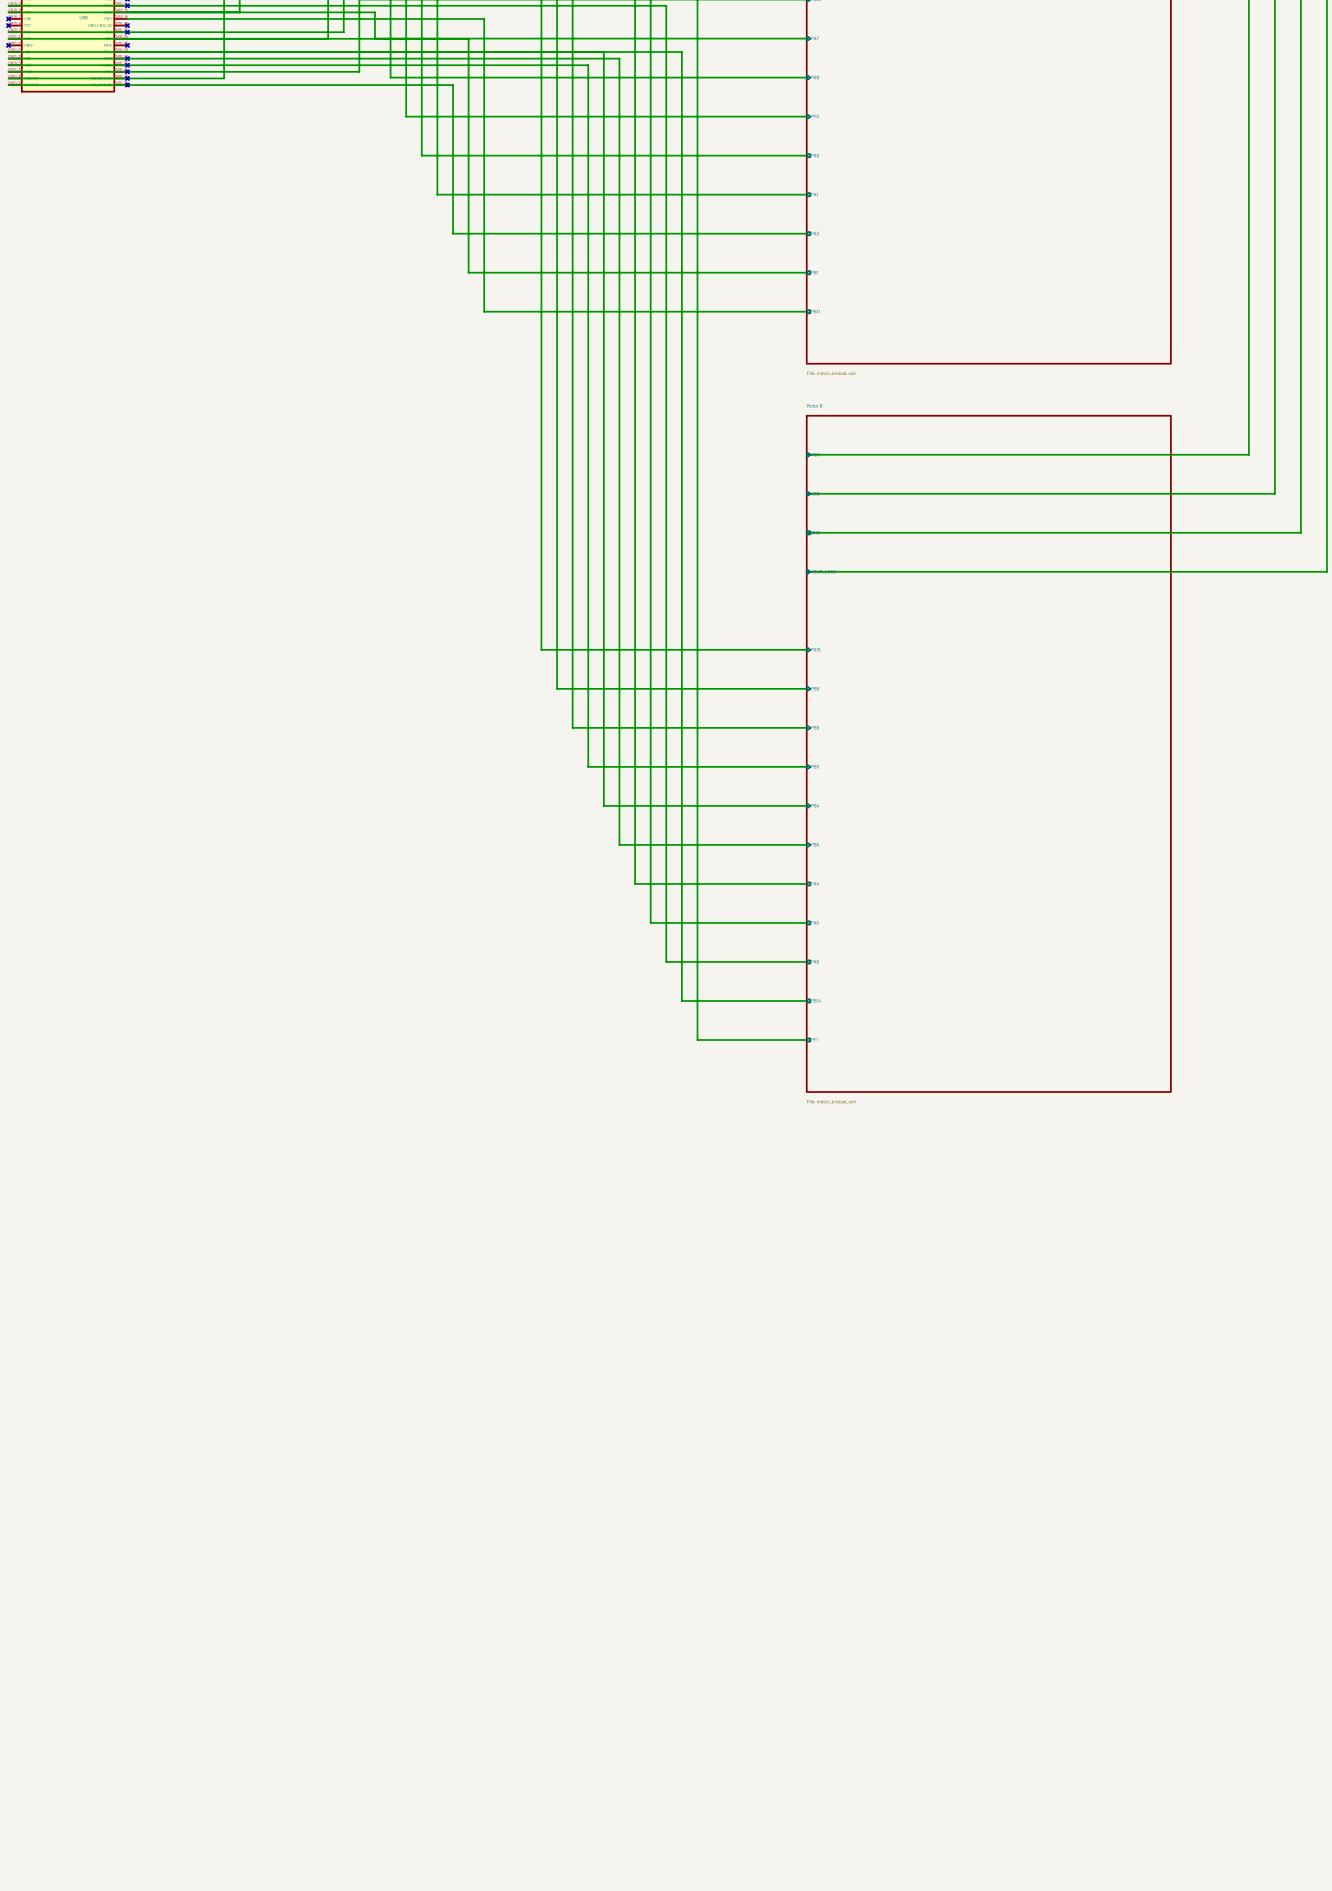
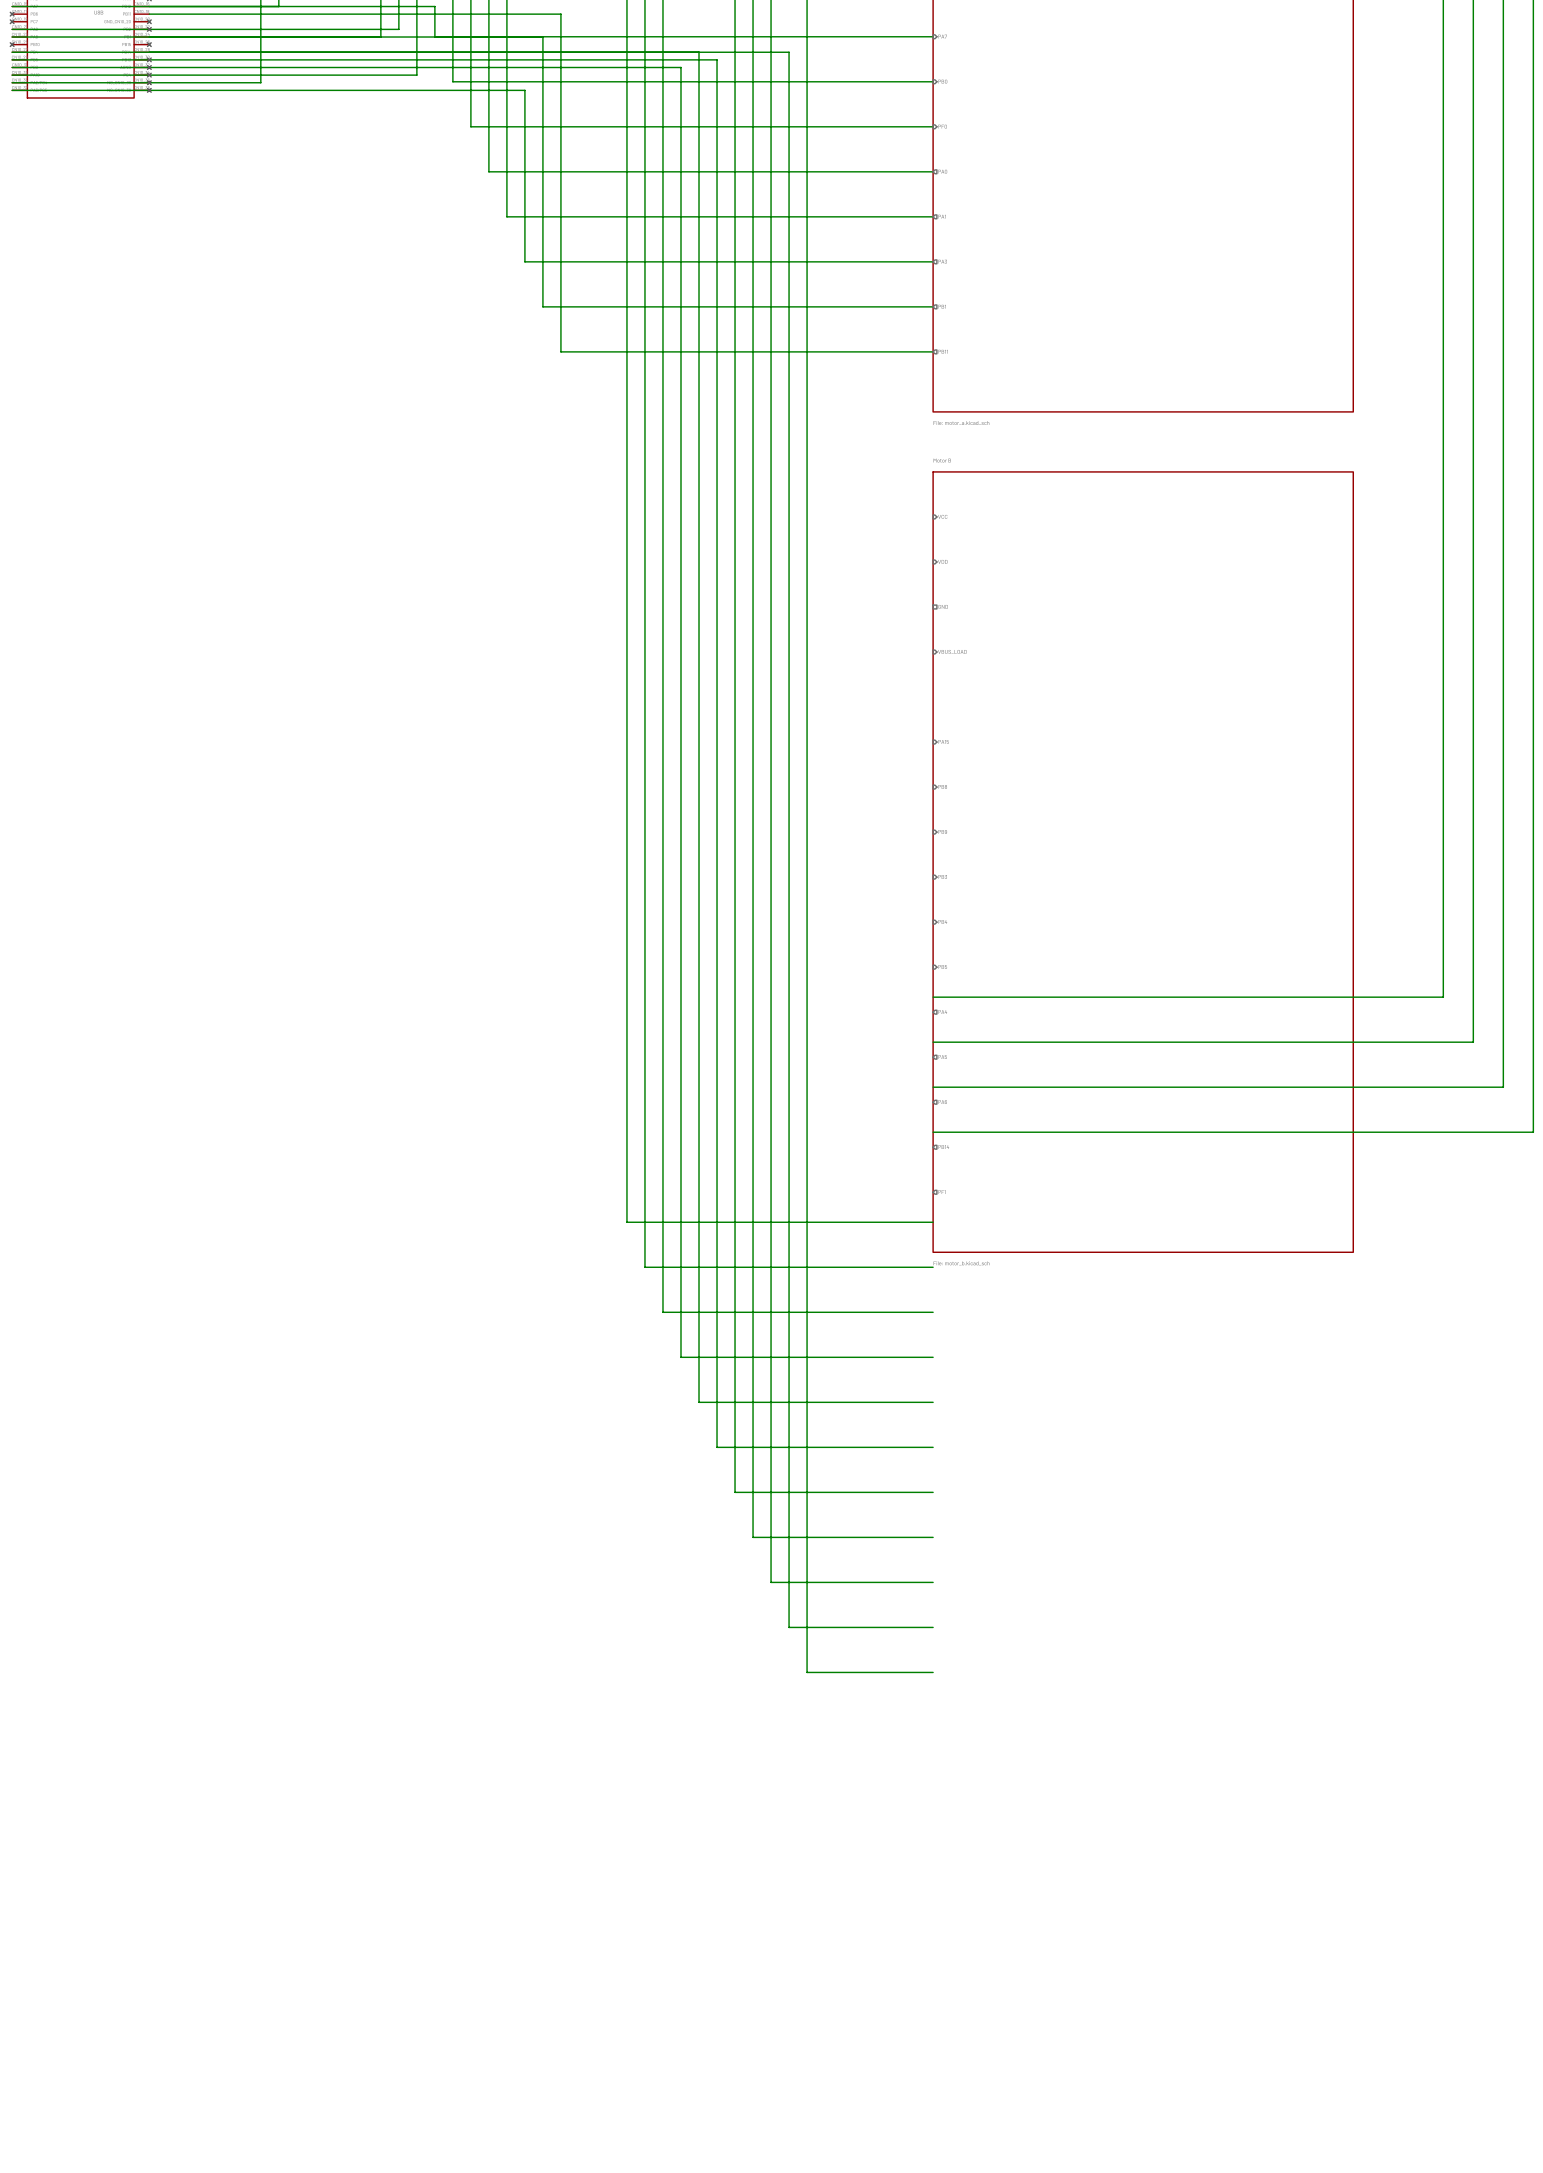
wire: (806, 454) (1248, 454) -> (933, 997) (1443, 997) (1443, 516)
wire: (806, 493) (1274, 493) -> (933, 1042) (1473, 1042) (1473, 561)
wire: (806, 532) (1300, 532) -> (933, 1087) (1503, 1087) (1503, 607)
wire: (806, 571) (1326, 571) -> (933, 1132) (1533, 1132) (1533, 652)
wire: (541, 649) (806, 649) -> (626, 742) (626, 1222) (933, 1222)
wire: (557, 688) (806, 688) -> (644, 787) (644, 1267) (933, 1267)
wire: (572, 727) (806, 727) -> (662, 832) (662, 1312) (933, 1312)
wire: (588, 766) (806, 766) -> (680, 877) (680, 1357) (933, 1357)
wire: (603, 805) (806, 805) -> (699, 922) (699, 1402) (933, 1402)
wire: (619, 844) (806, 844) -> (717, 967) (717, 1447) (933, 1447)
wire: (635, 883) (806, 883) -> (735, 1012) (735, 1492) (933, 1492)
wire: (650, 922) (806, 922) -> (753, 1057) (753, 1537) (933, 1537)
wire: (666, 961) (806, 961) -> (771, 1102) (771, 1582) (933, 1582)
wire: (681, 1000) (806, 1000) -> (789, 1147) (789, 1627) (933, 1627)
wire: (697, 1040) (806, 1040) -> (807, 1192) (807, 1672) (933, 1672)

